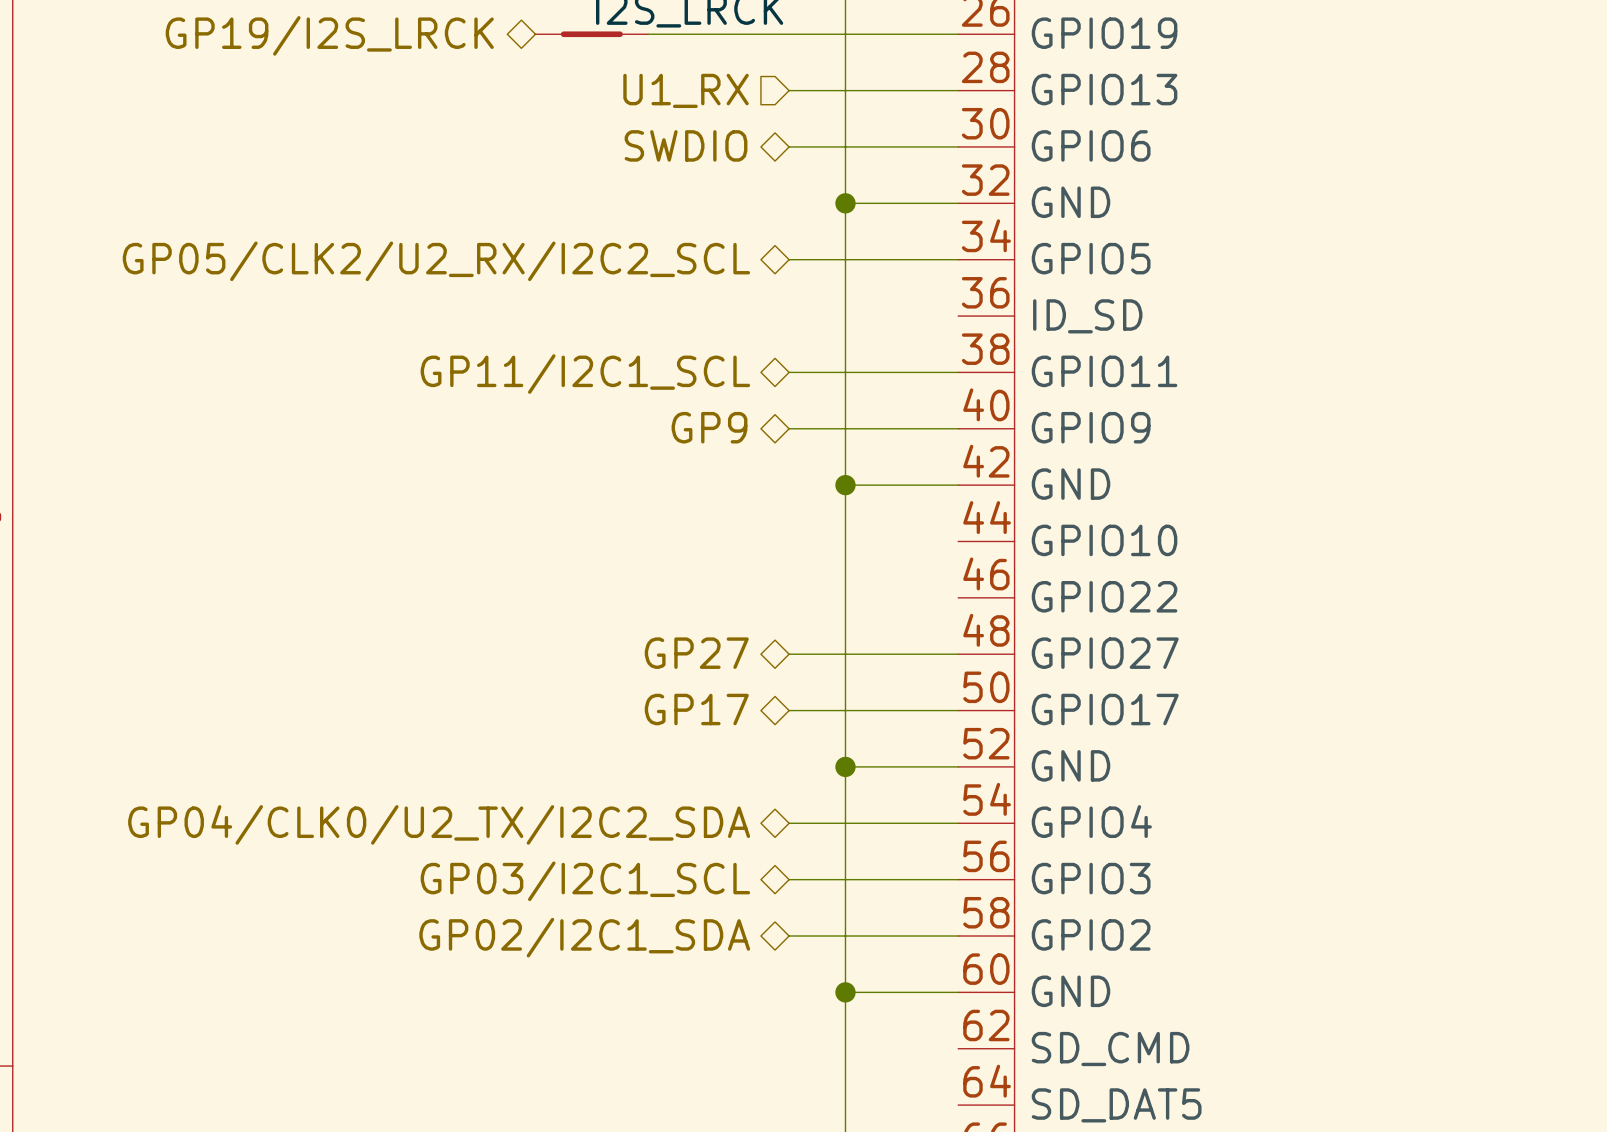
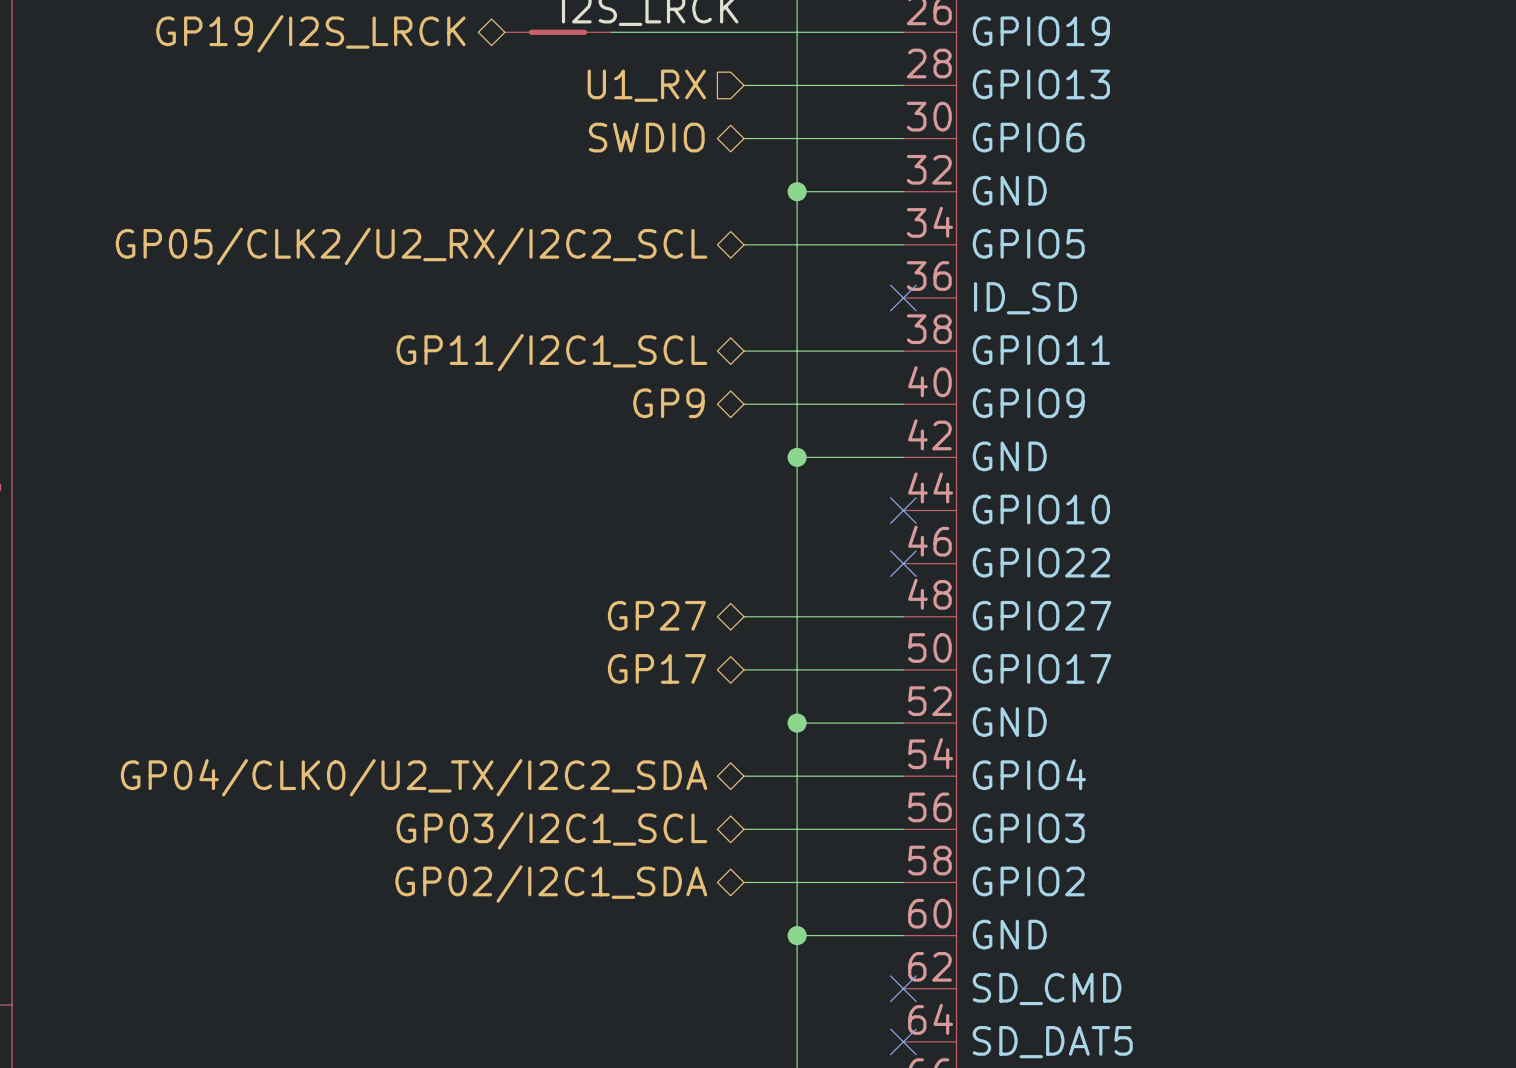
no-connect mark: none -> (903, 297)
no-connect mark: none -> (903, 510)
no-connect mark: none -> (903, 563)
no-connect mark: none -> (903, 988)
no-connect mark: none -> (903, 1041)

